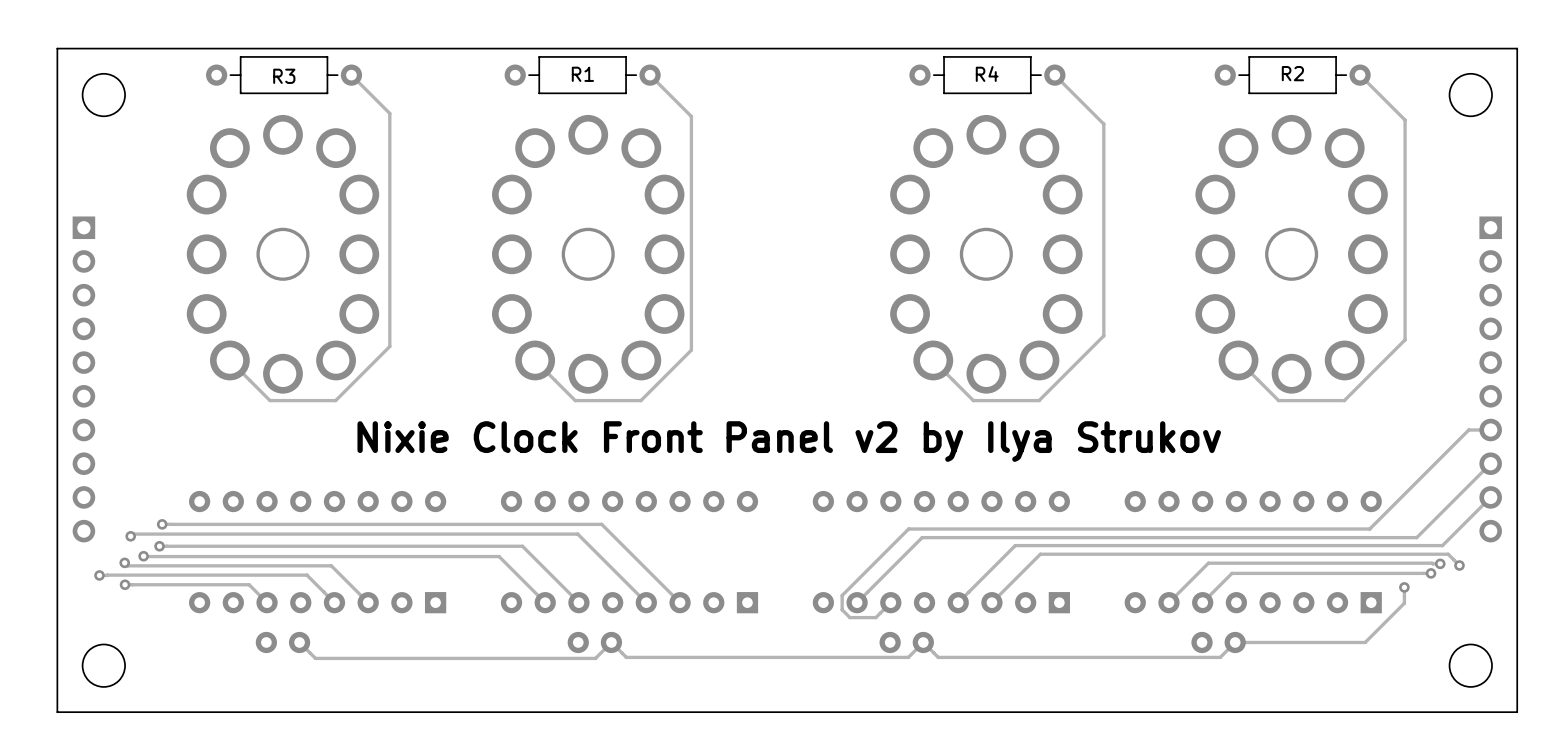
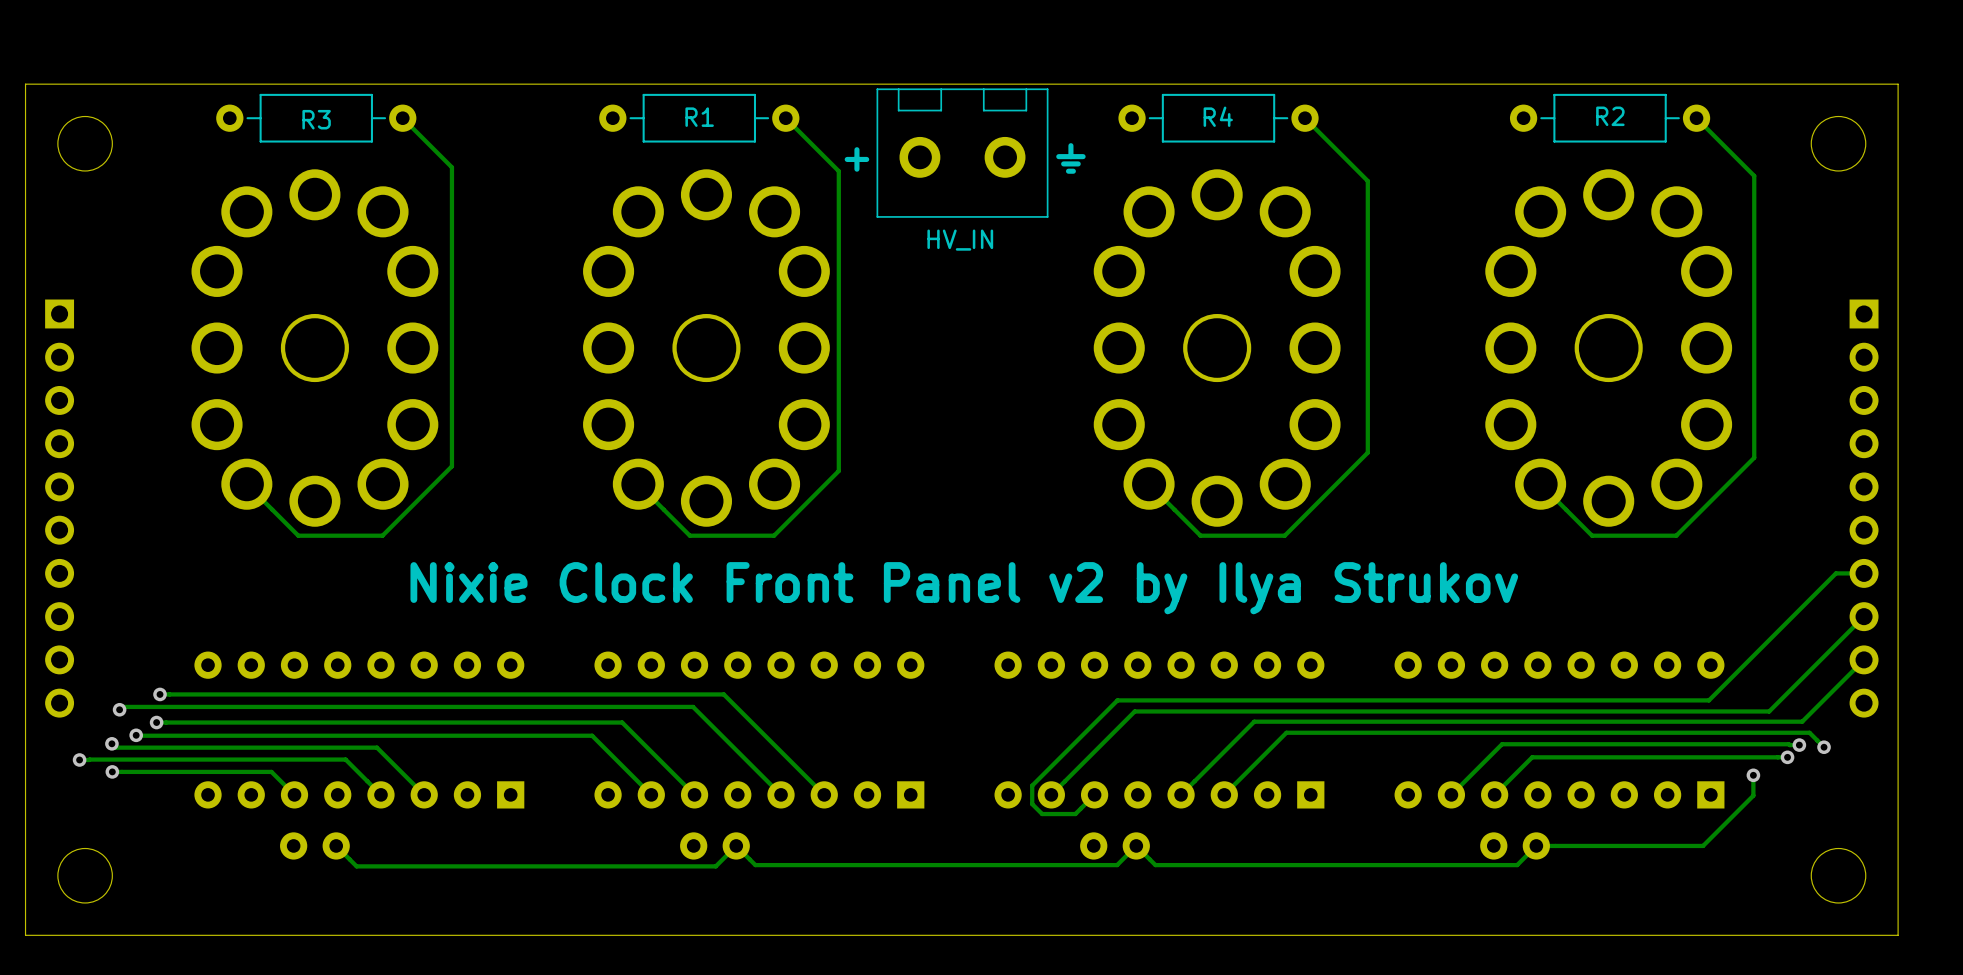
part: none -> HV_IN (962, 153)
text: none -> ⏚ (1070, 158)
text: none -> + (856, 159)

